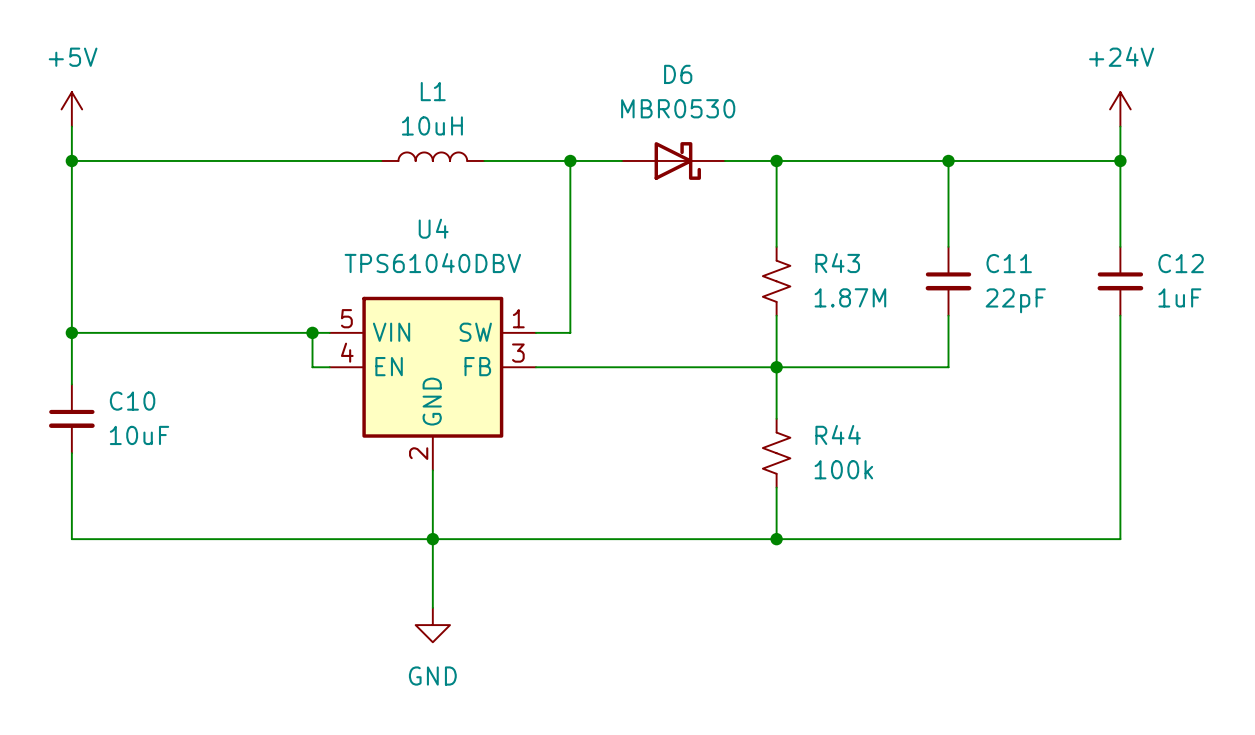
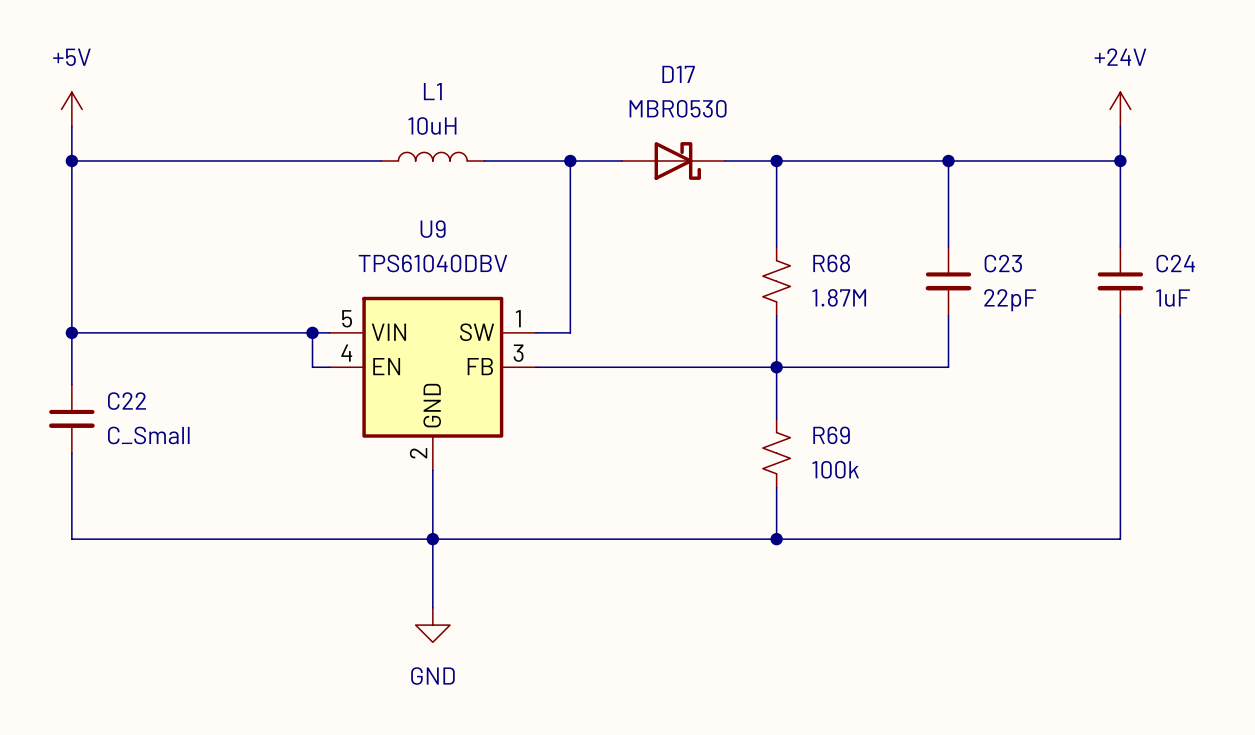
D6 name: D6 (678, 74) -> D17 (678, 74)
U4 name: U4 (433, 228) -> U9 (433, 229)
R43 name: R43 (837, 263) -> R68 (831, 263)
C11 name: C11 (1009, 263) -> C23 (1003, 263)
C12 name: C12 (1181, 263) -> C24 (1175, 263)
C10 name: C10 (132, 401) -> C22 (127, 401)
R44 name: R44 (838, 434) -> R69 (831, 435)
C10 value: 10uF (139, 435) -> C_Small (148, 435)

